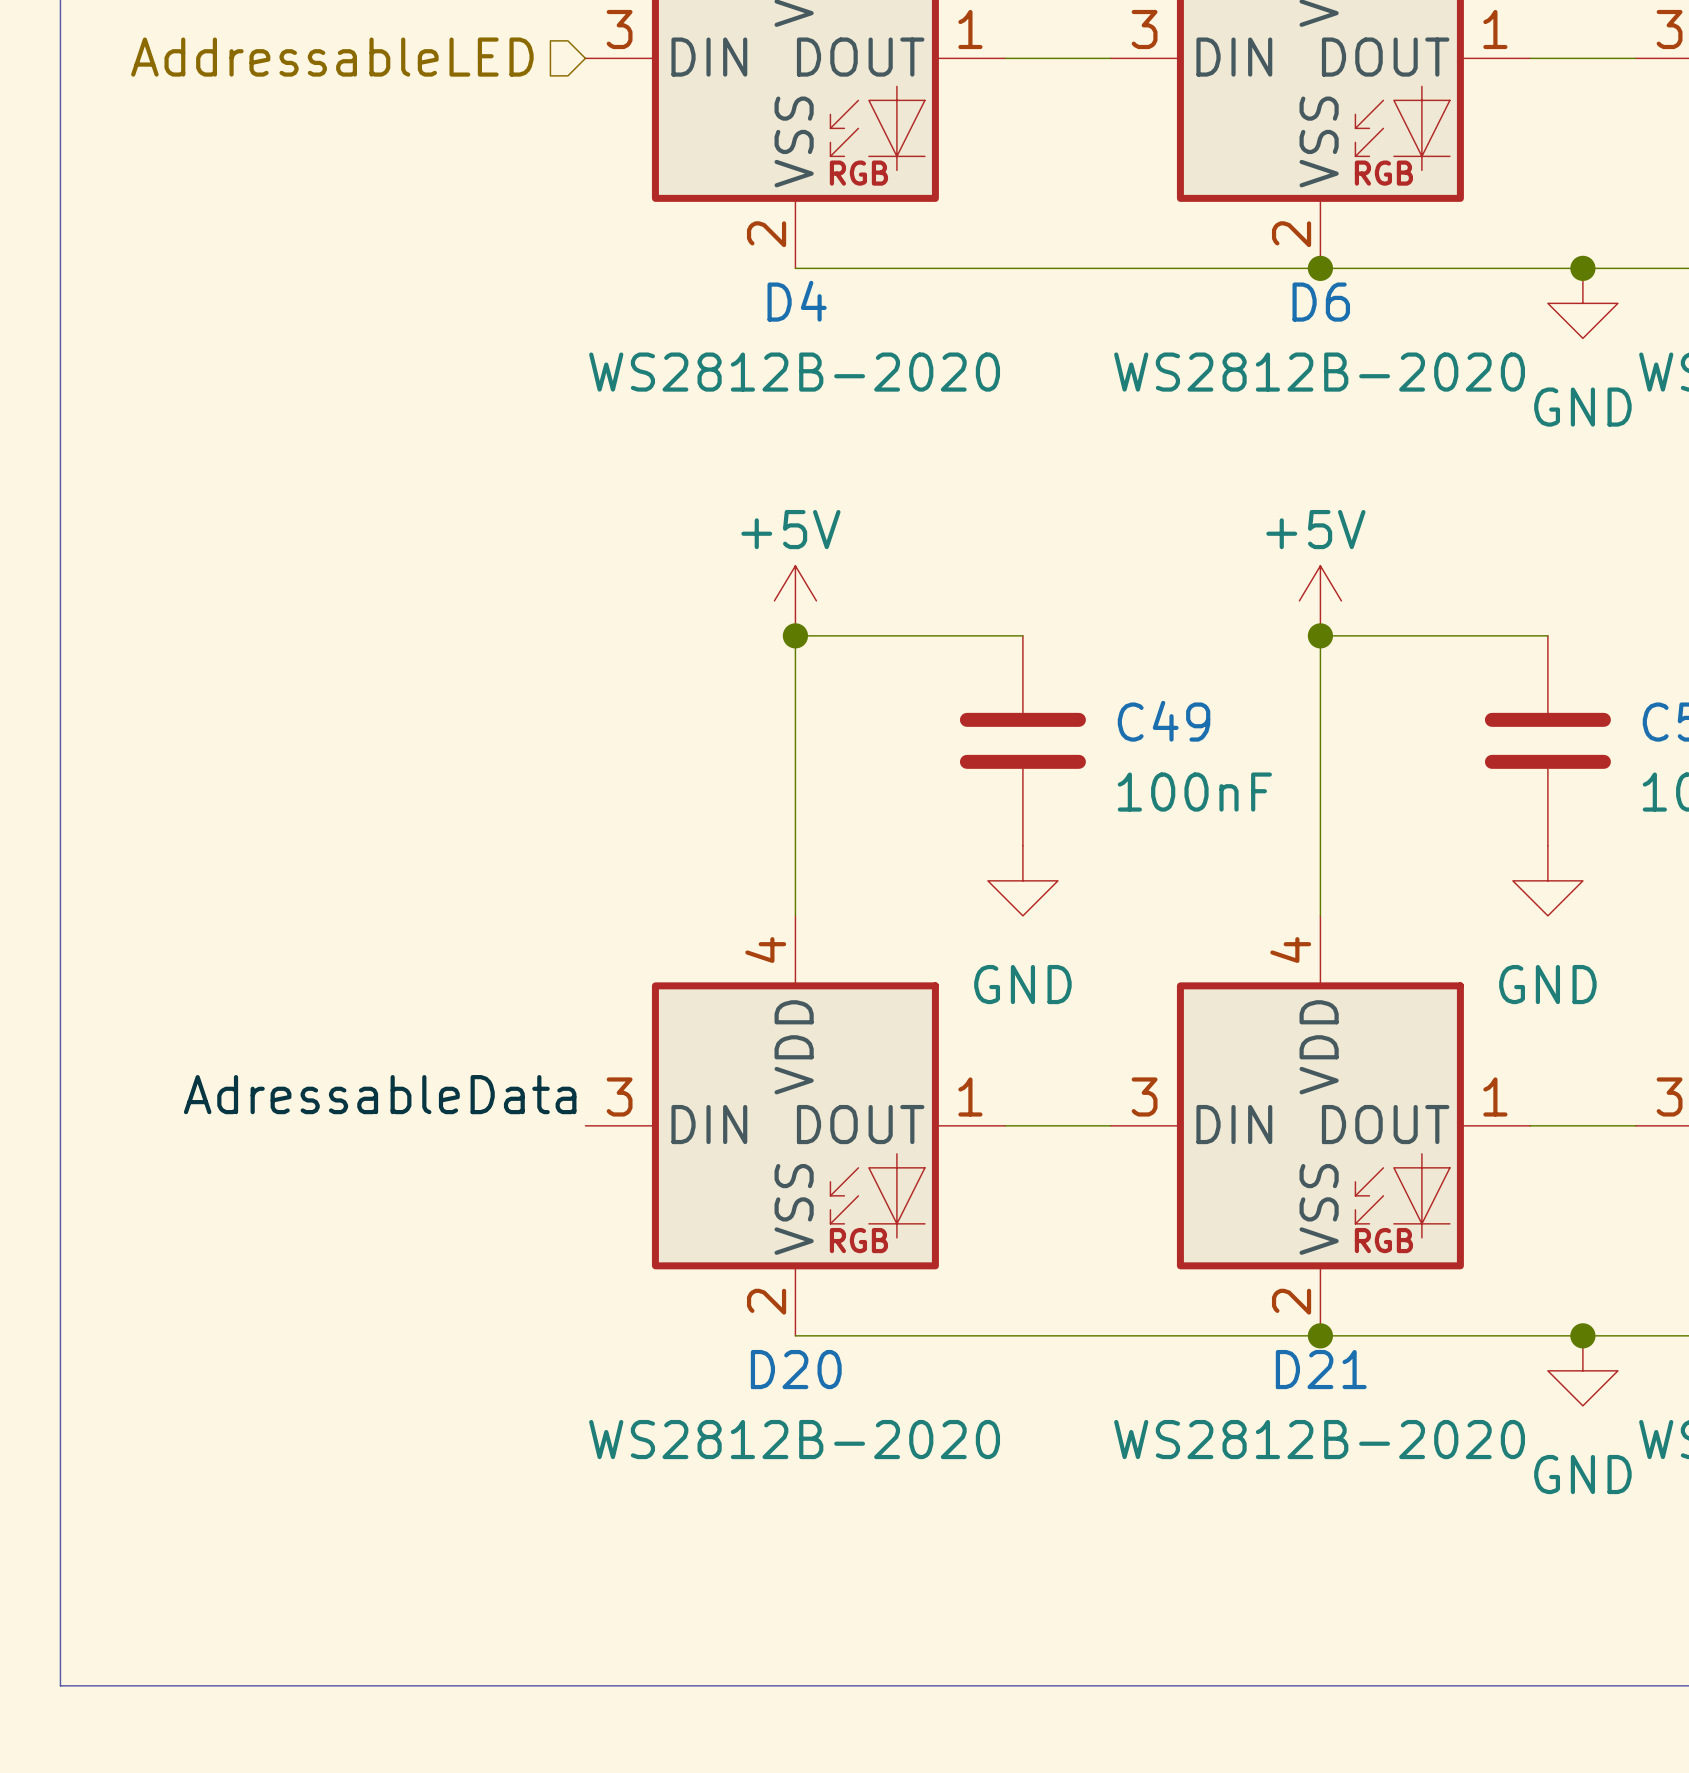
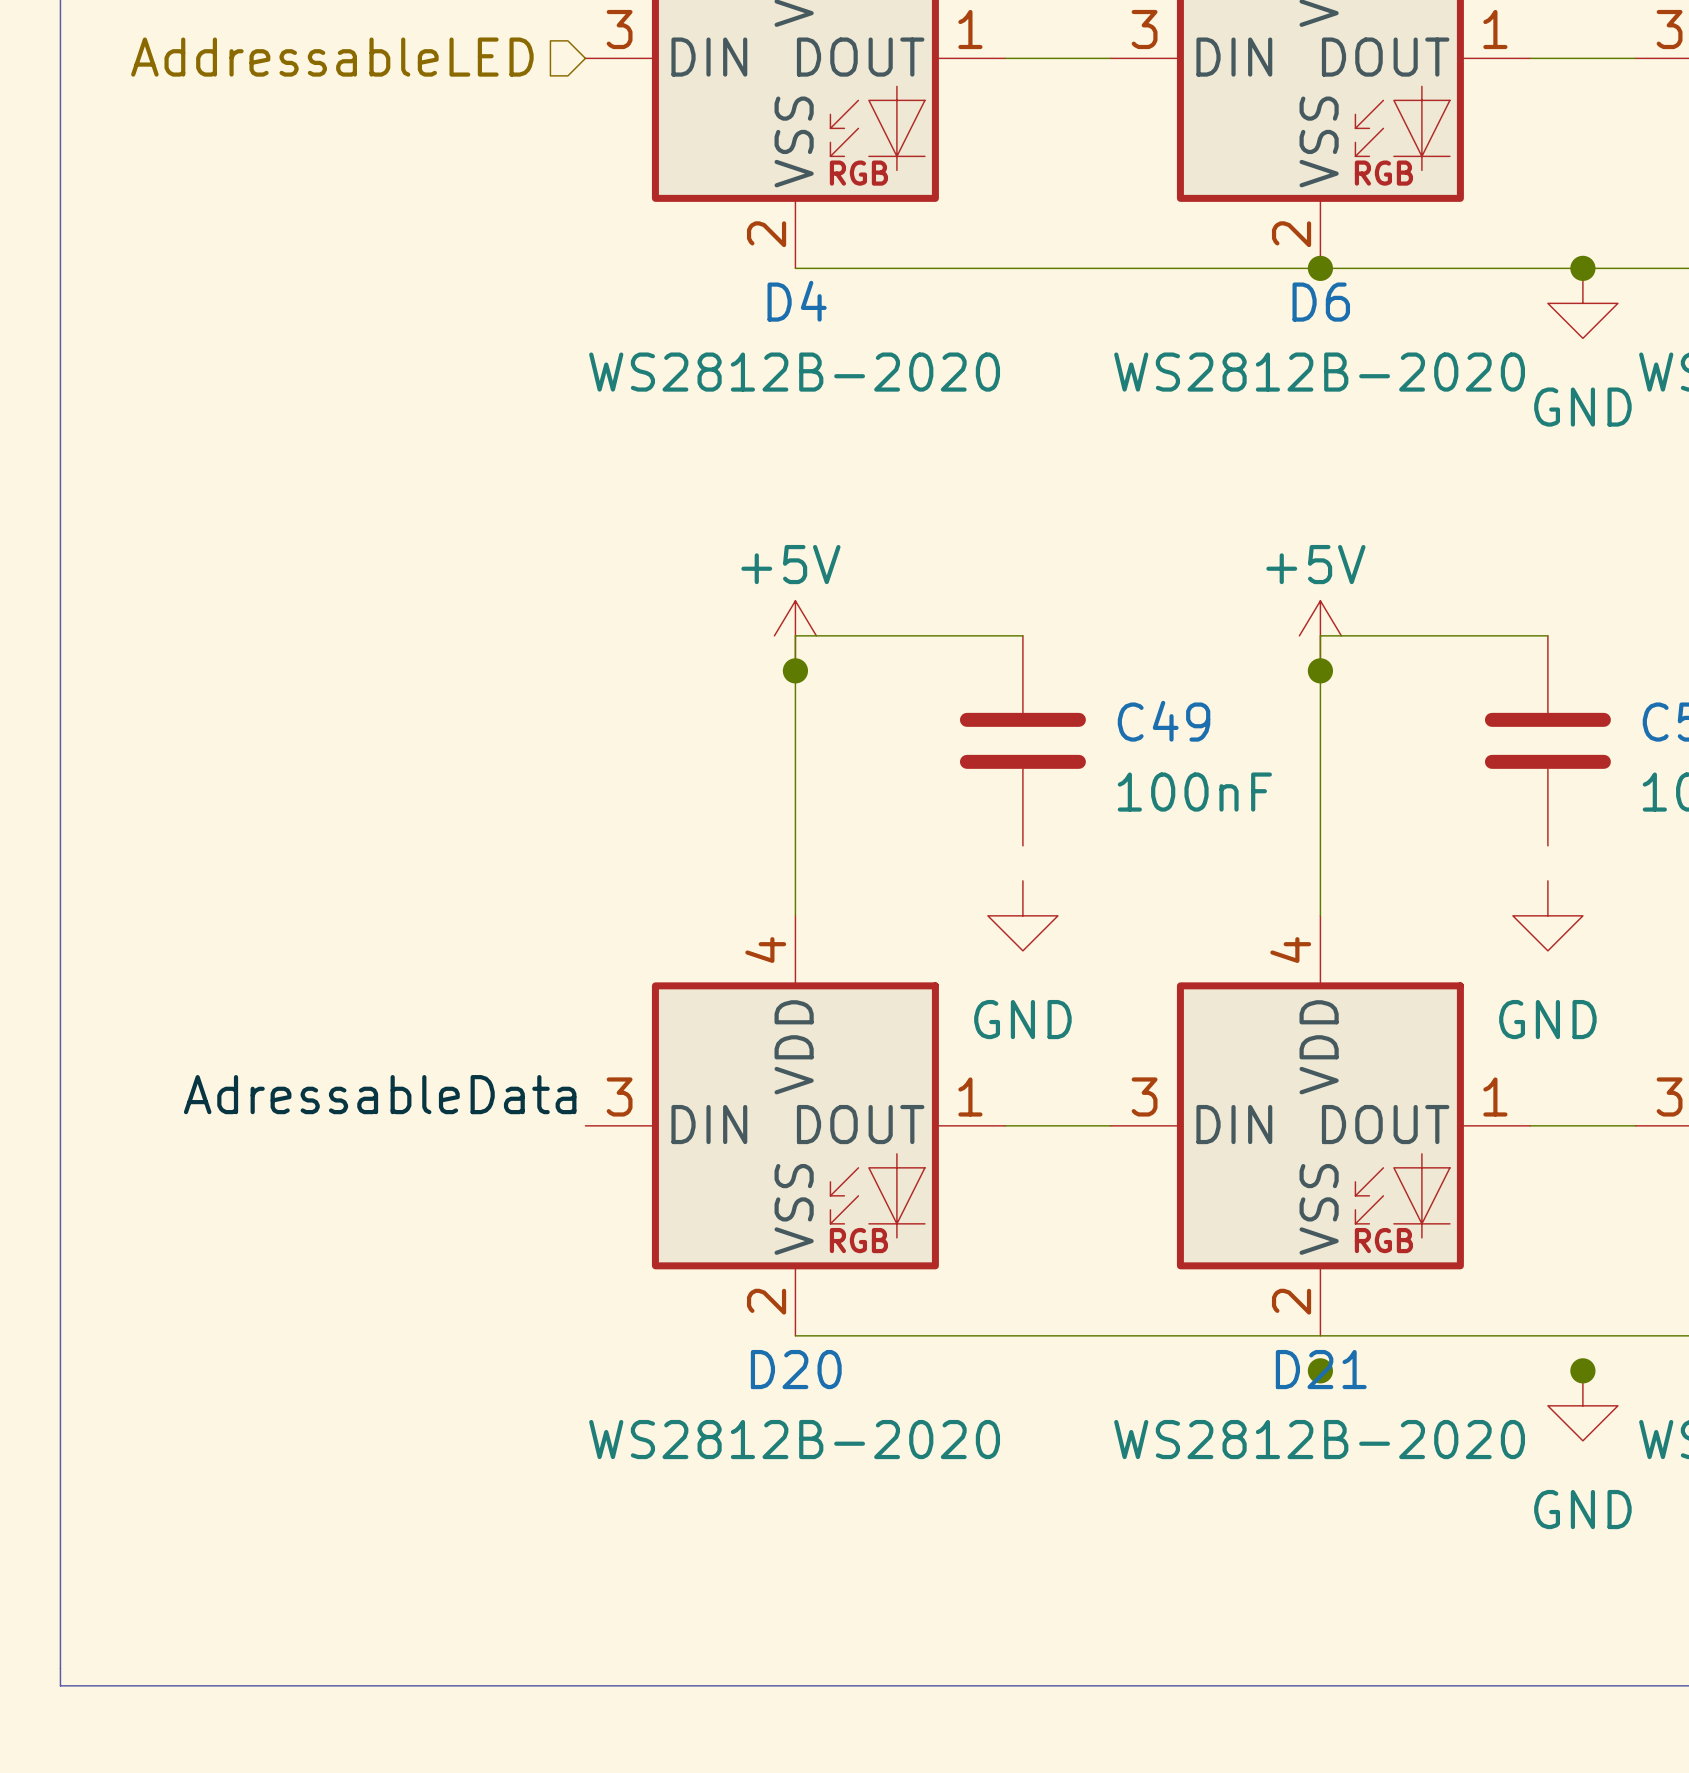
power symbol position: +5V (795, 600) -> +5V (795, 635)
power symbol position: +5V (1320, 600) -> +5V (1320, 635)
junction position: (795, 635) -> (795, 670)
junction position: (1320, 635) -> (1320, 670)
power symbol position: GND (1022, 880) -> GND (1022, 915)
power symbol position: GND (1547, 880) -> GND (1547, 915)
junction position: (1320, 1335) -> (1320, 1370)
junction position: (1582, 1335) -> (1582, 1370)
power symbol position: GND (1582, 1370) -> GND (1582, 1405)

